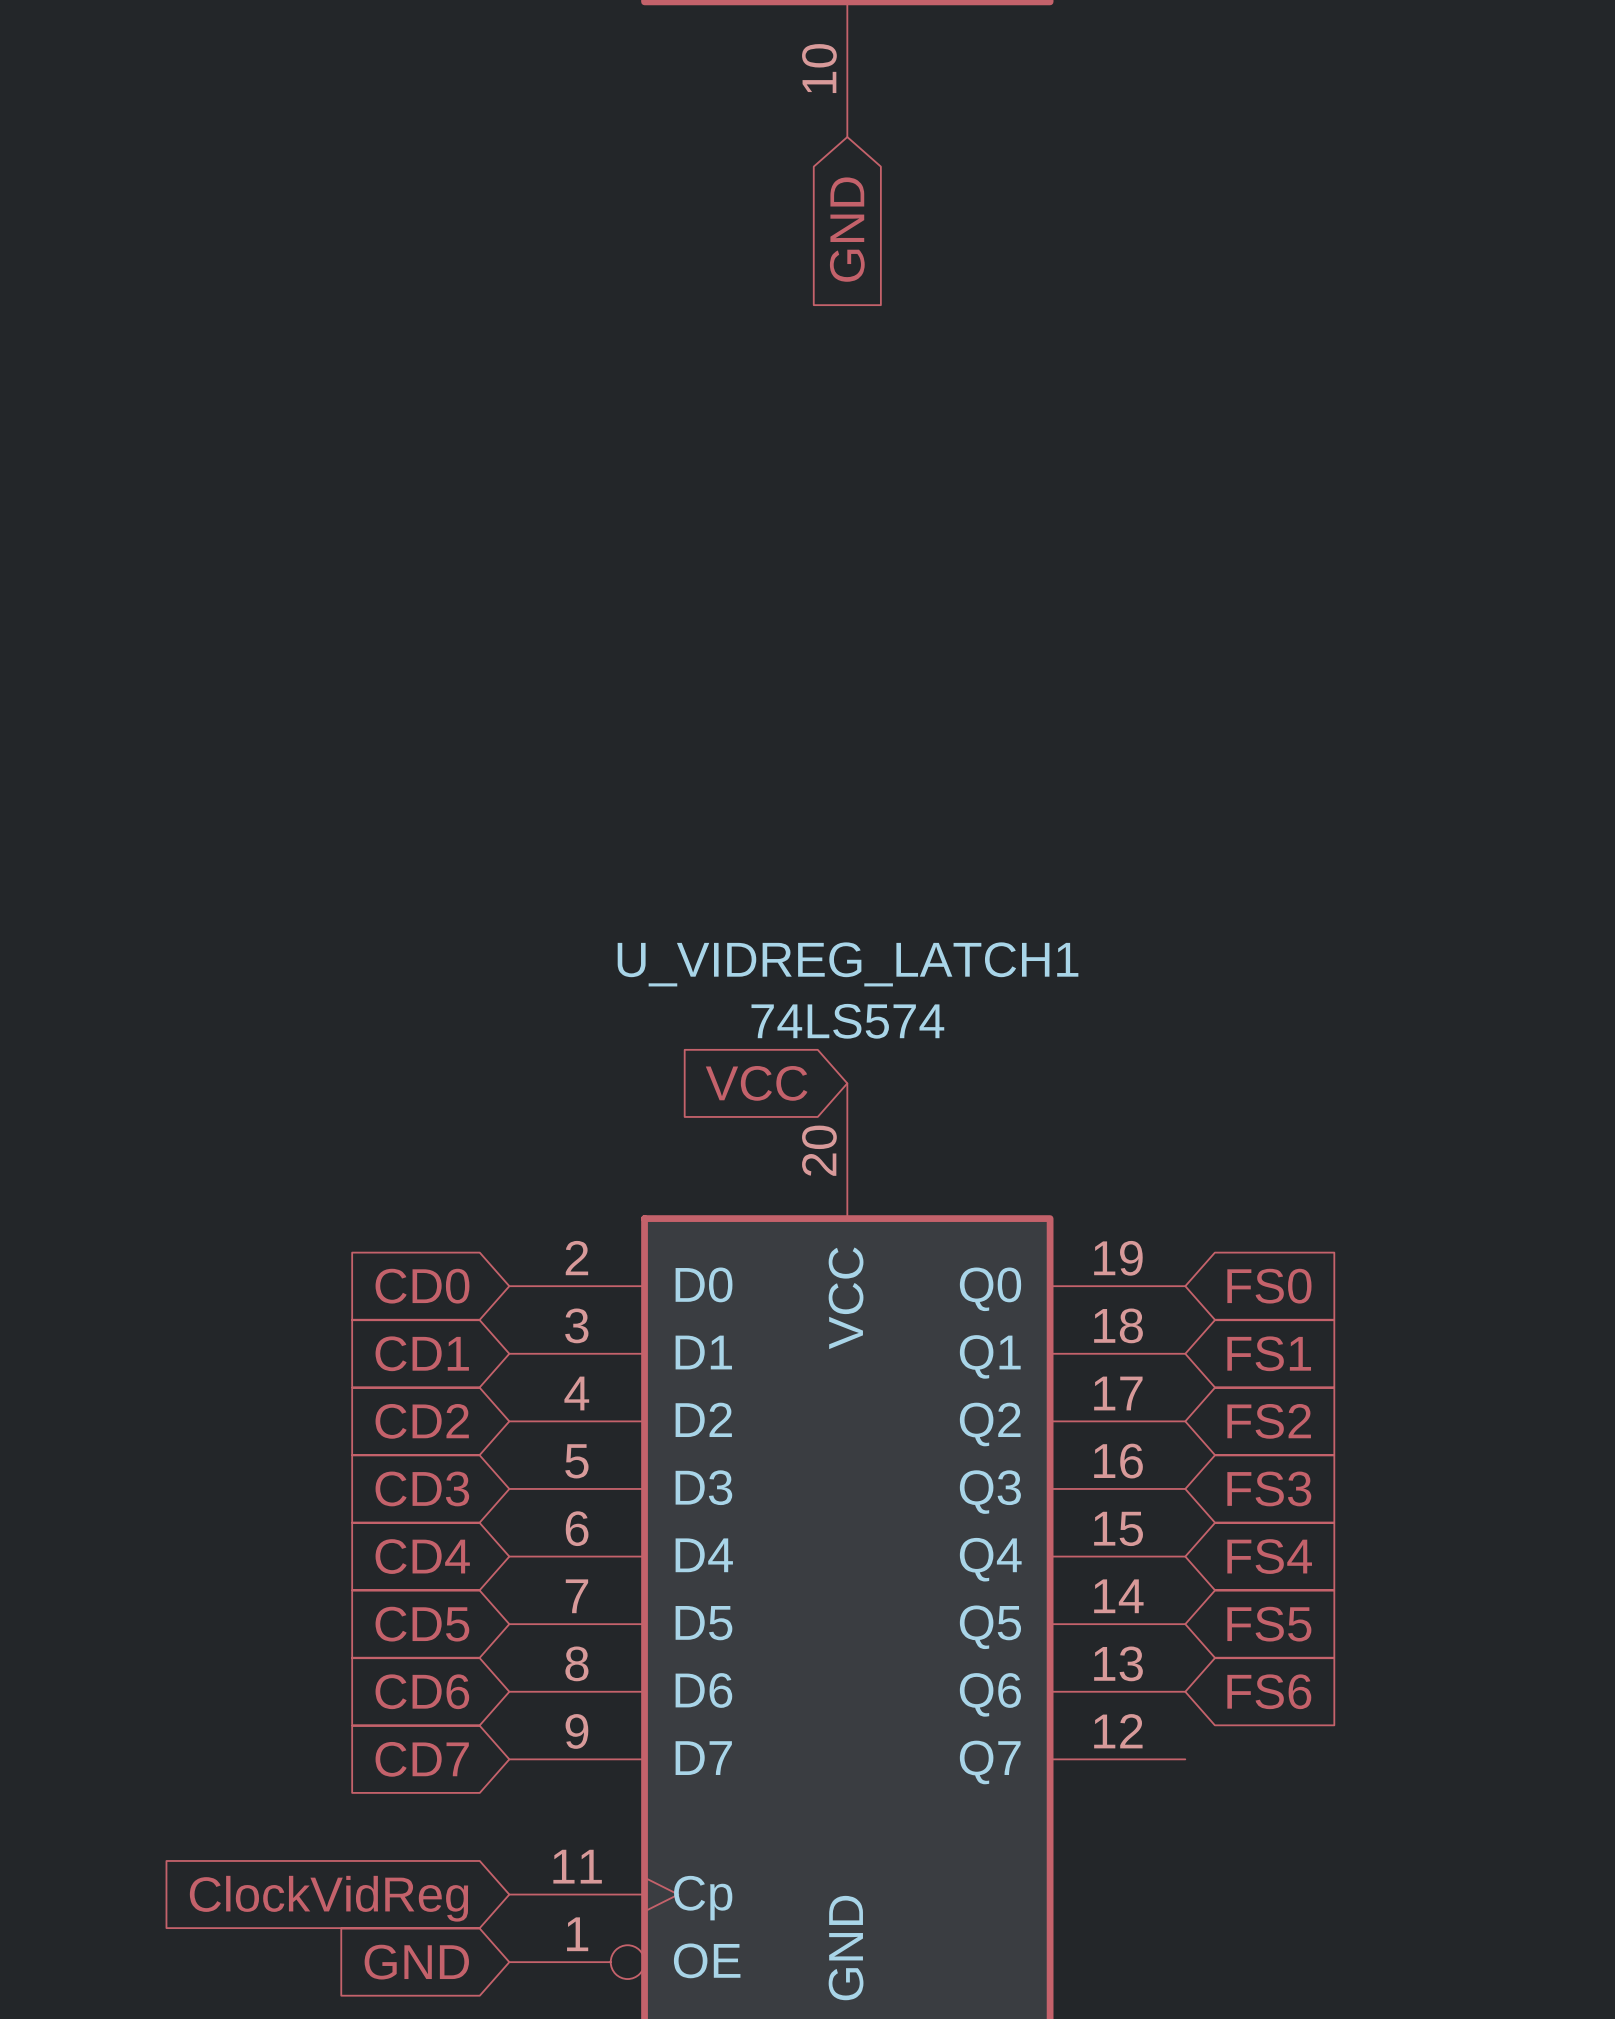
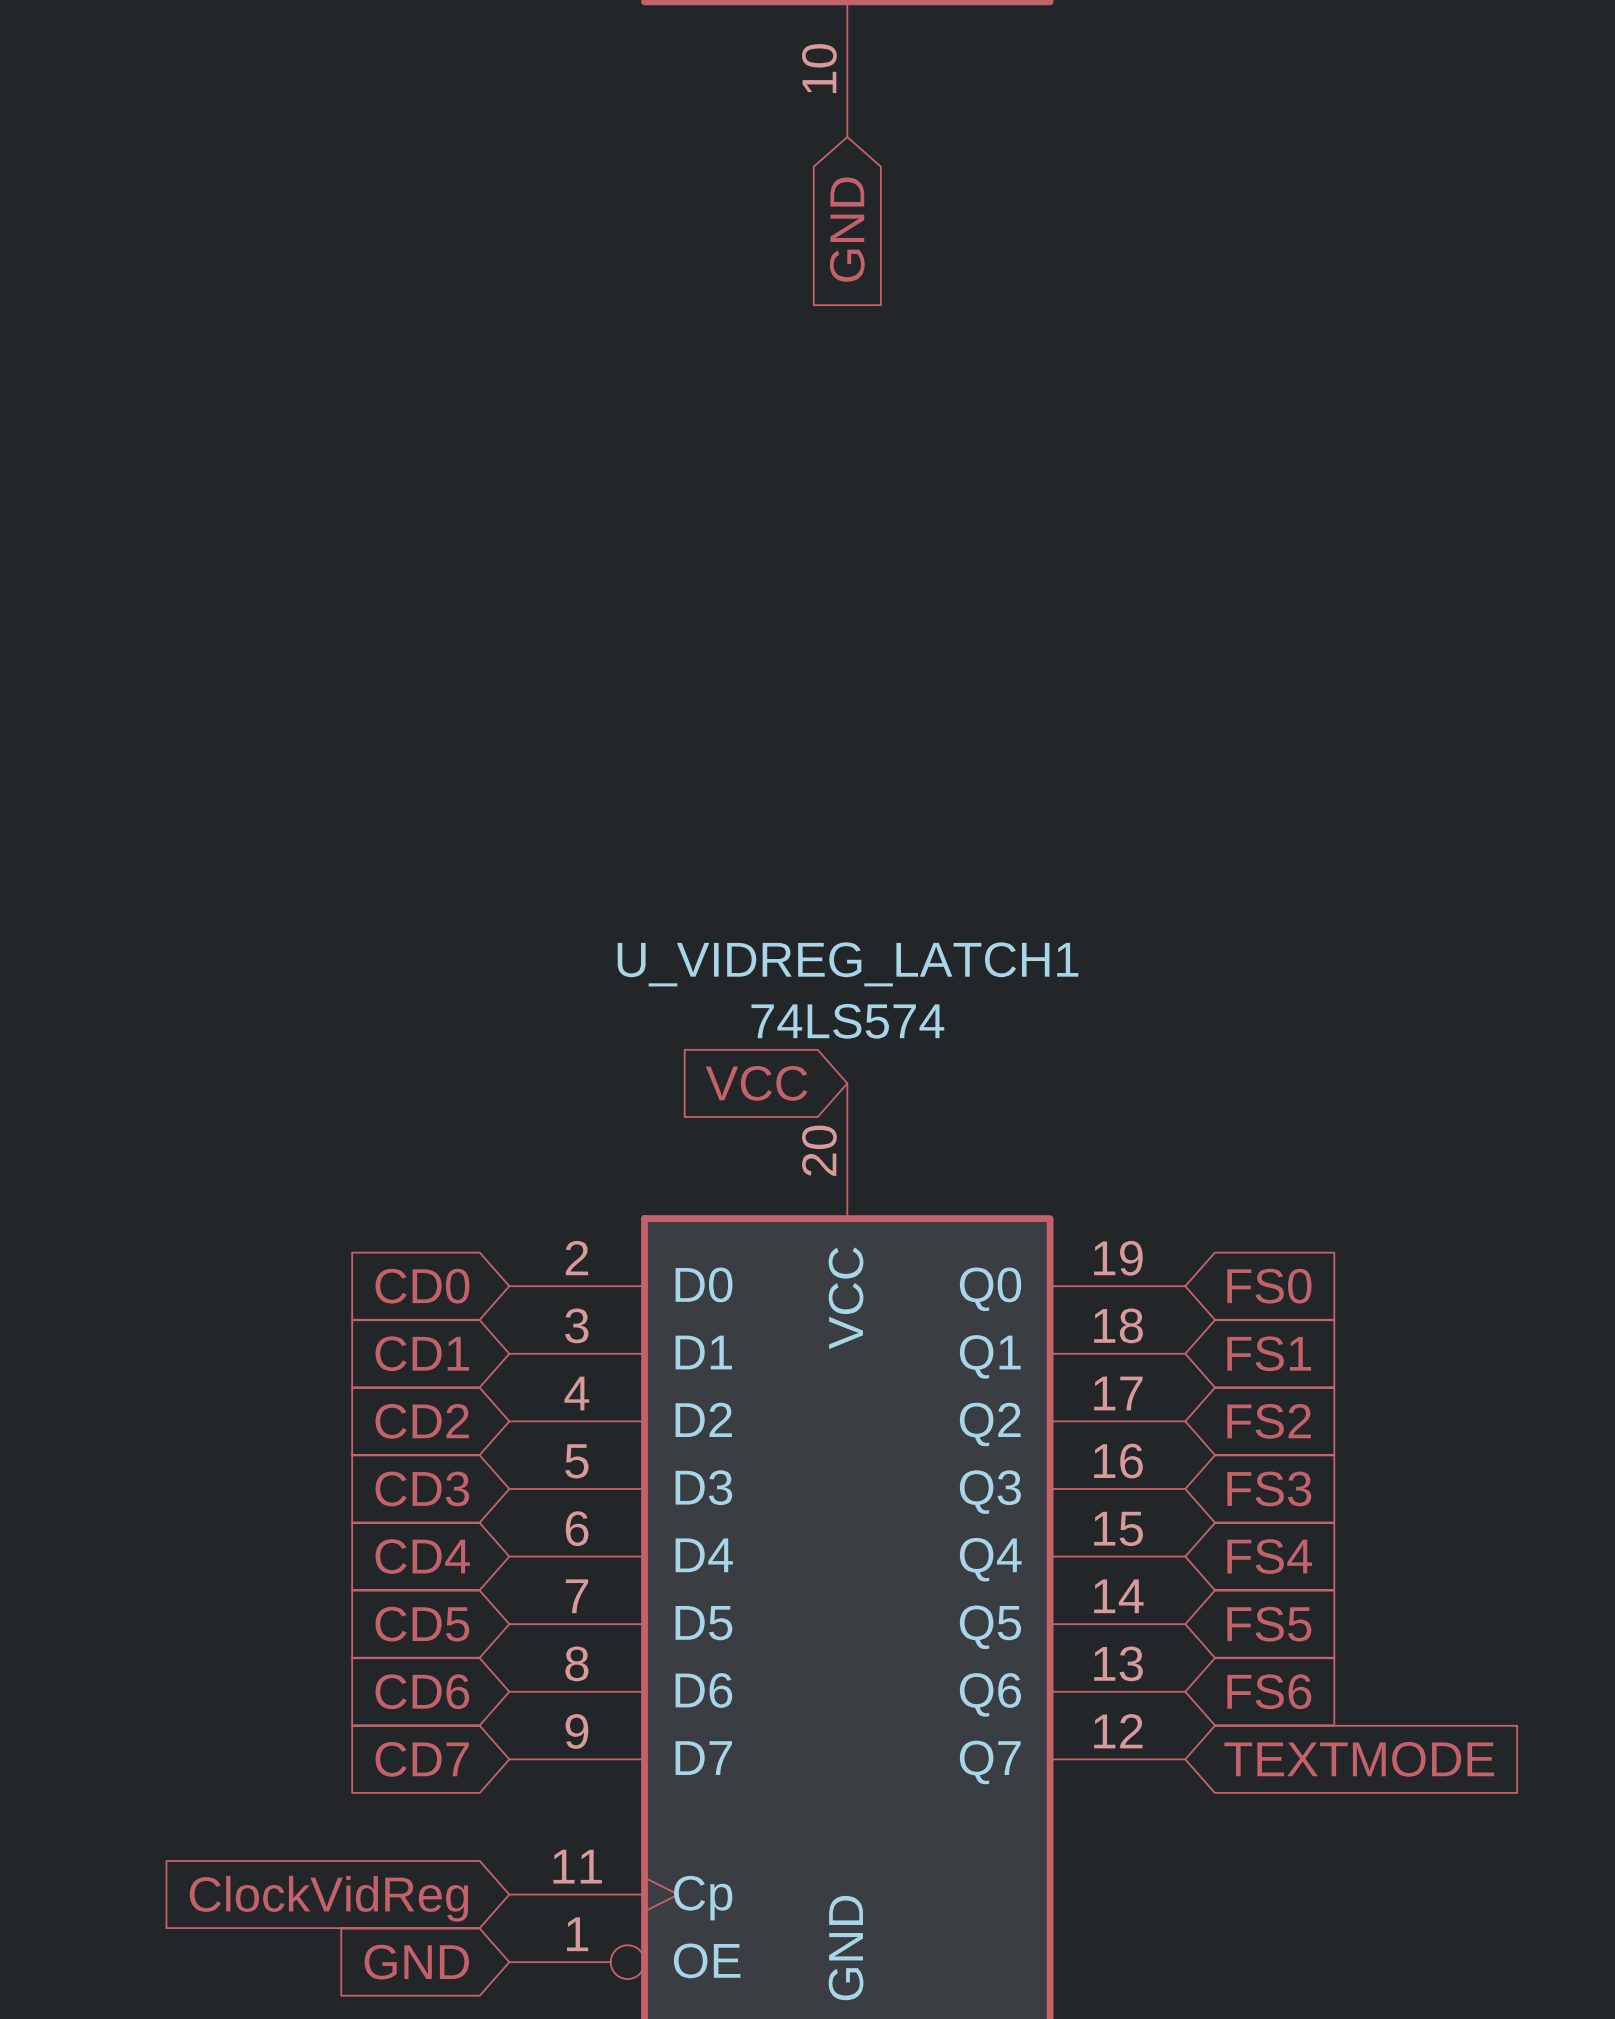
global label: none -> TEXTMODE (1359, 1759)

